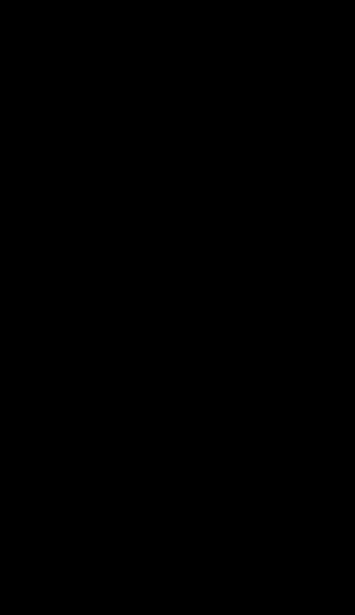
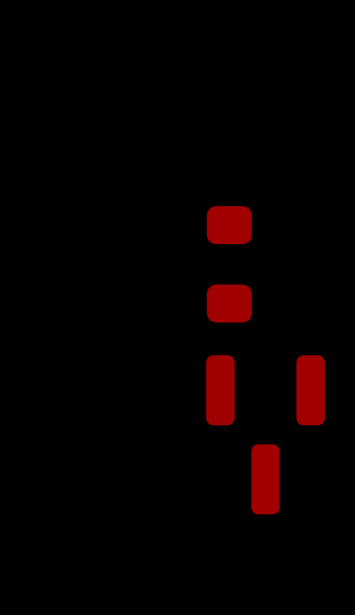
part: none -> (229, 264)
part: none -> (265, 434)

